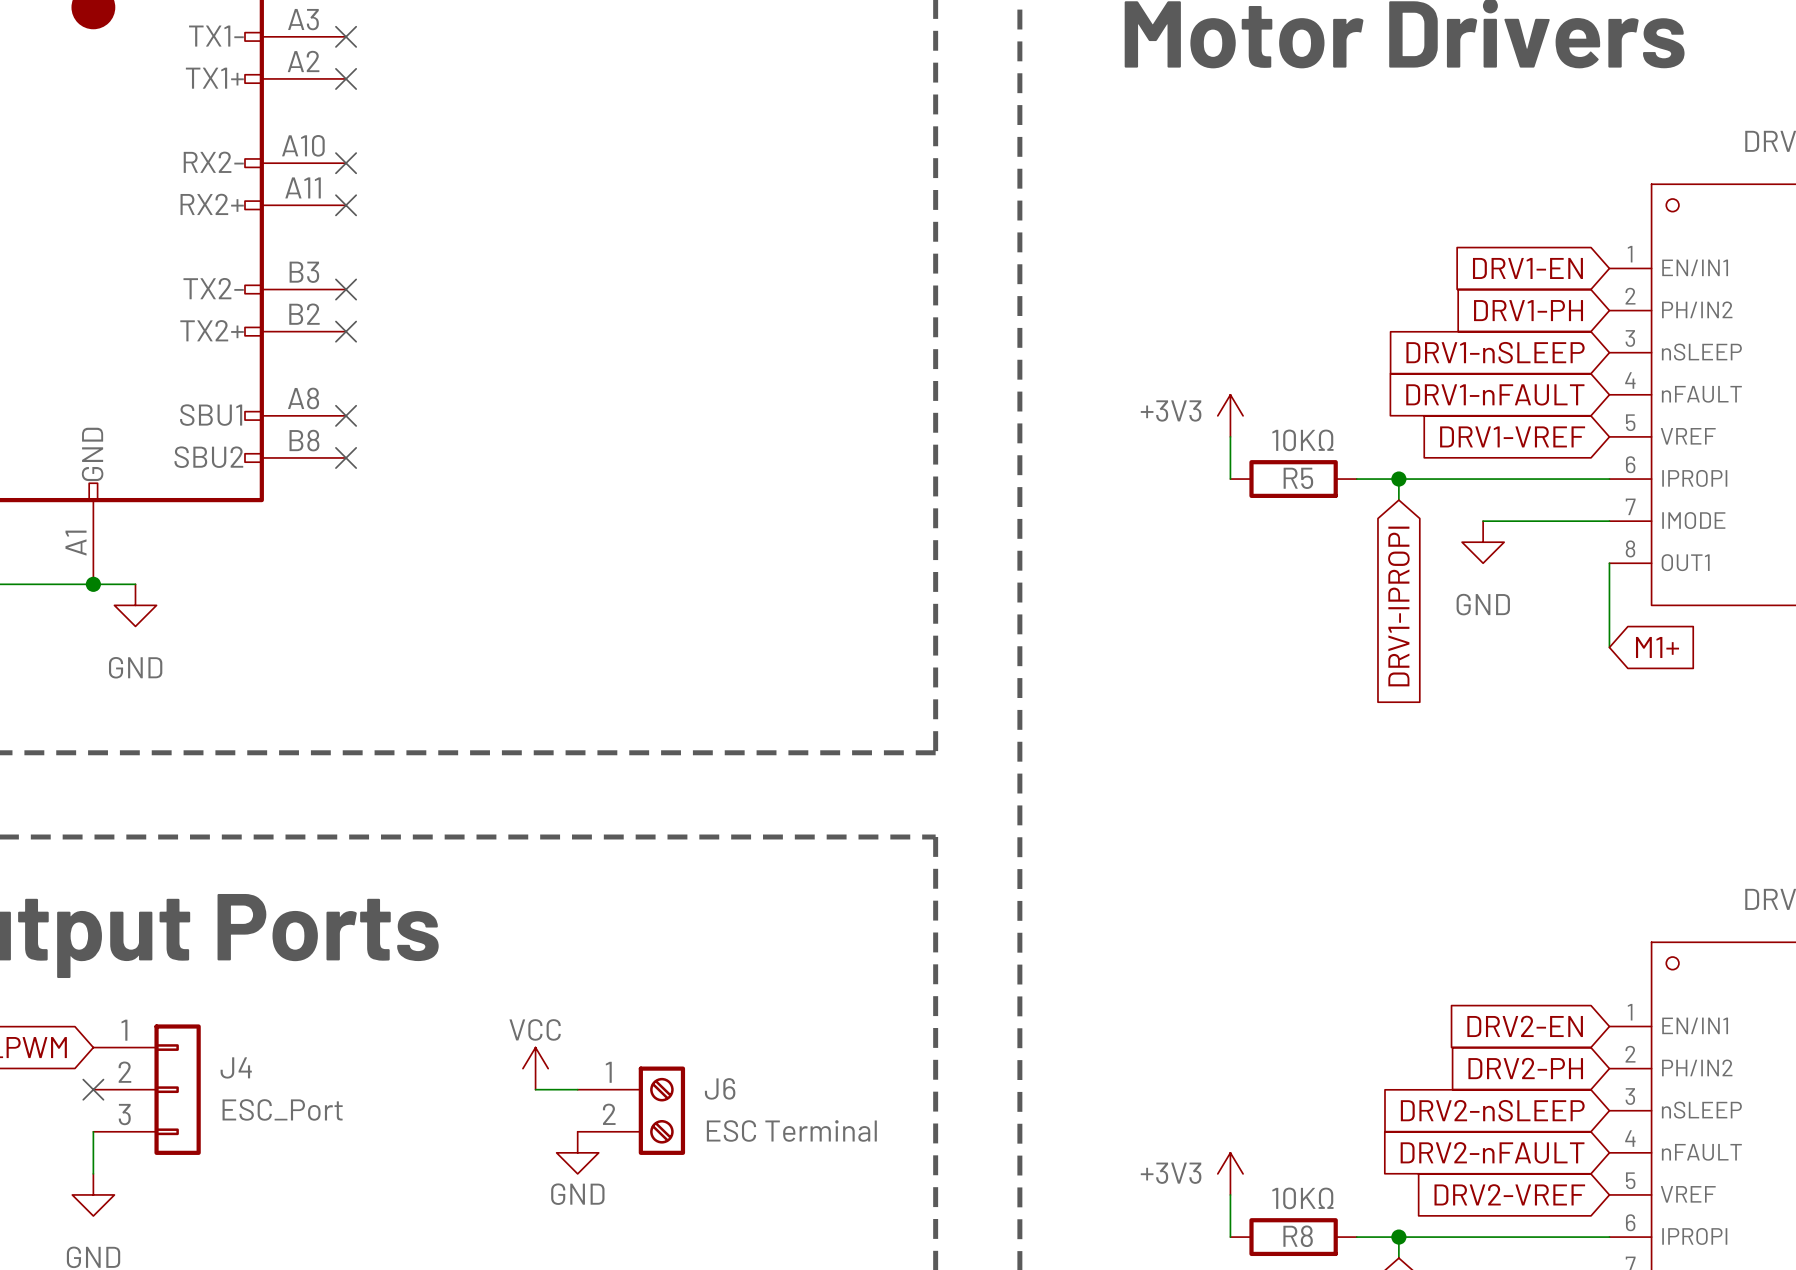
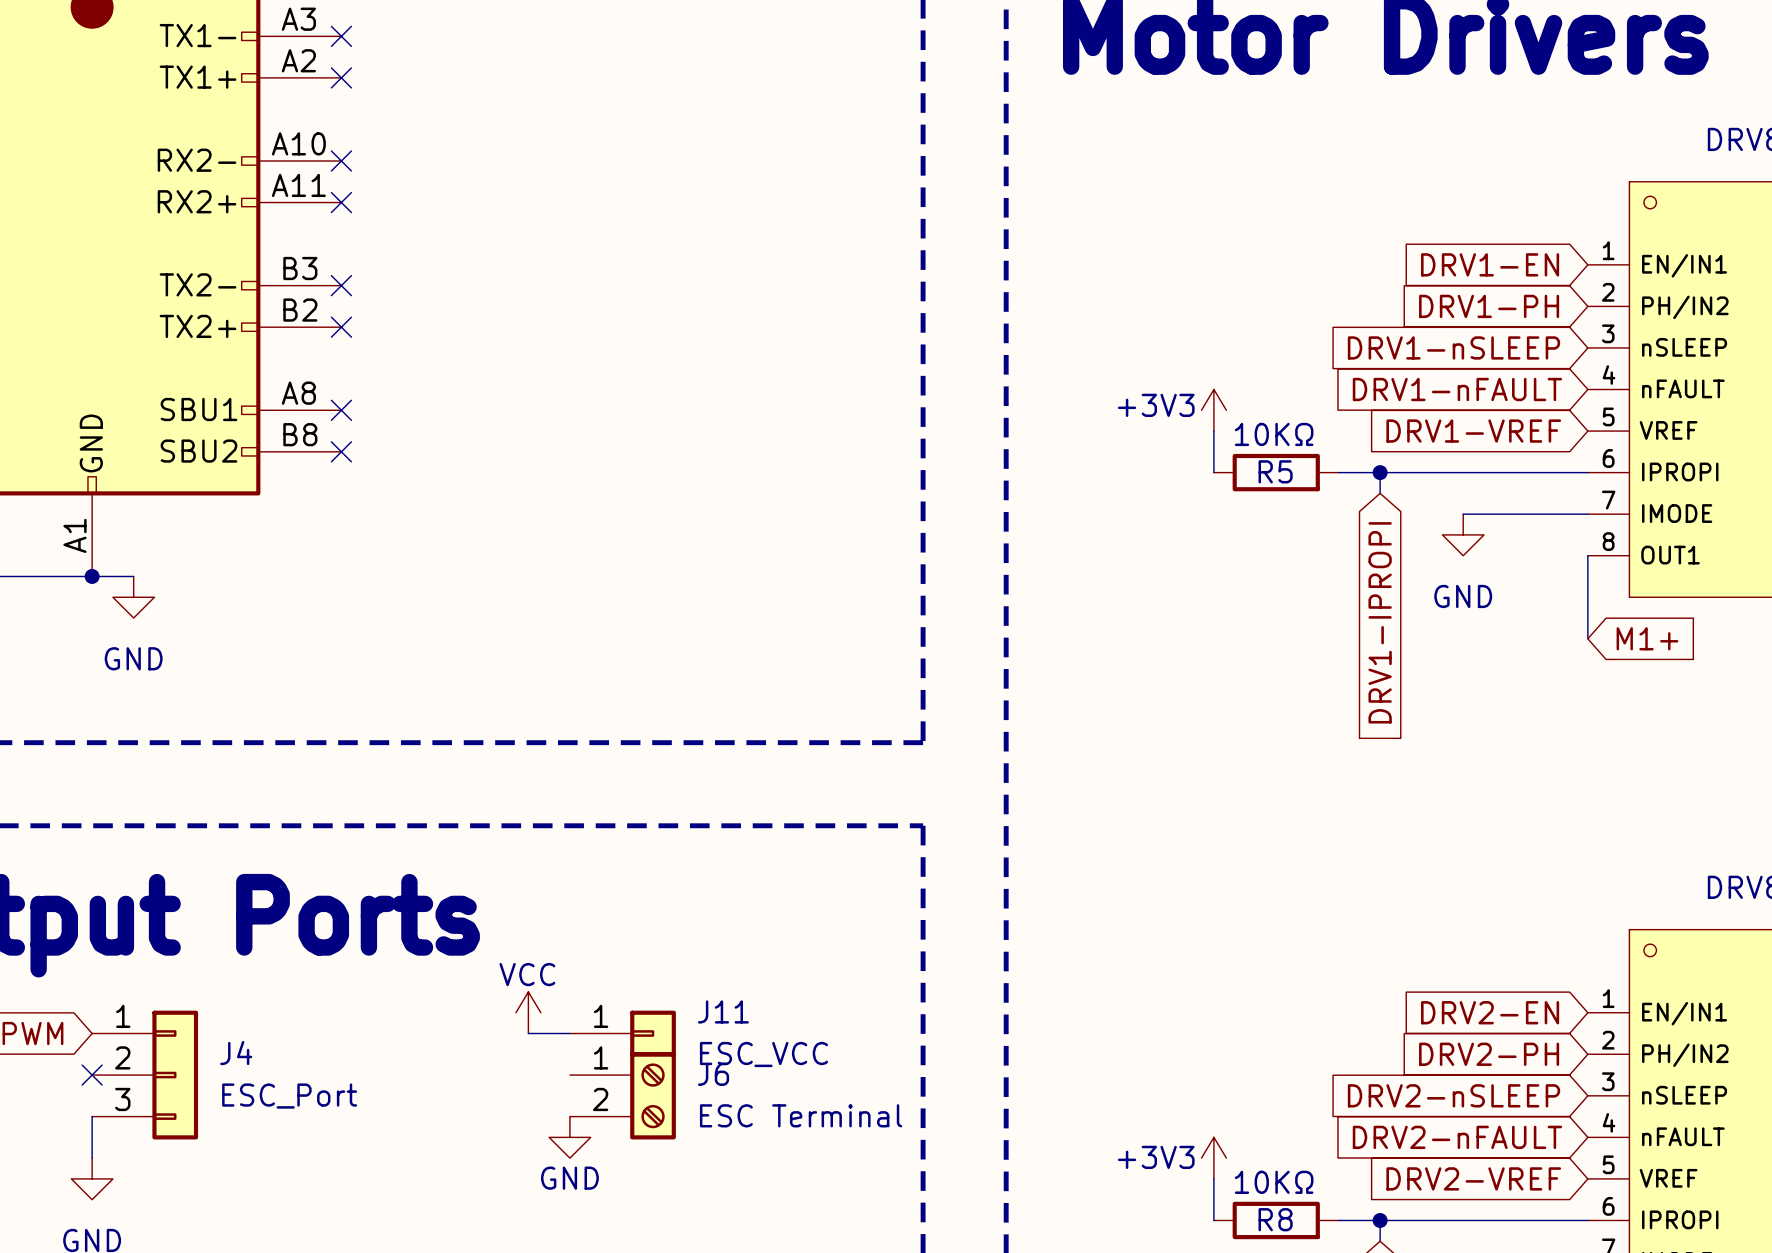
J11: none -> ESC_VCC (622, 1033)
power symbol position: VCC (535, 1068) -> VCC (528, 1012)
wire: (535, 1089) (577, 1089) -> (528, 1033) (569, 1033)

